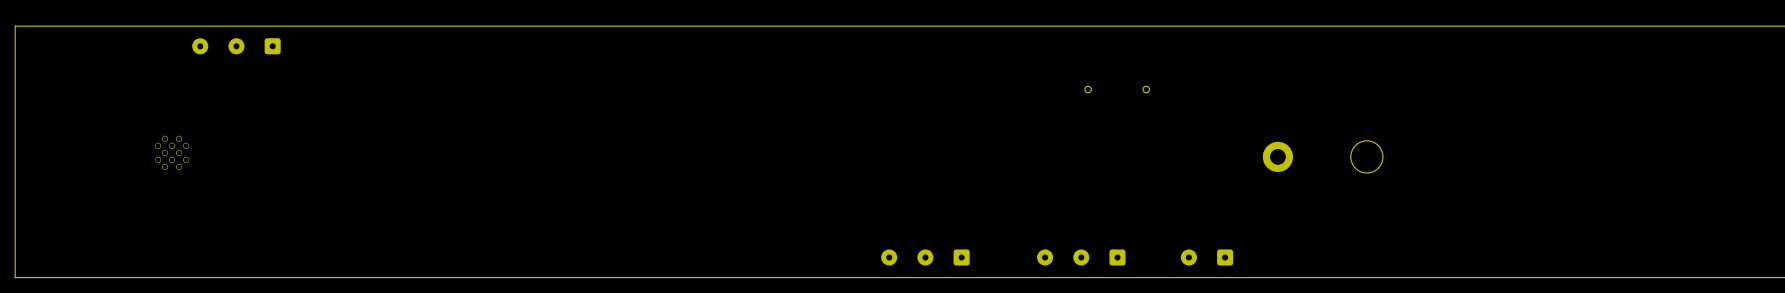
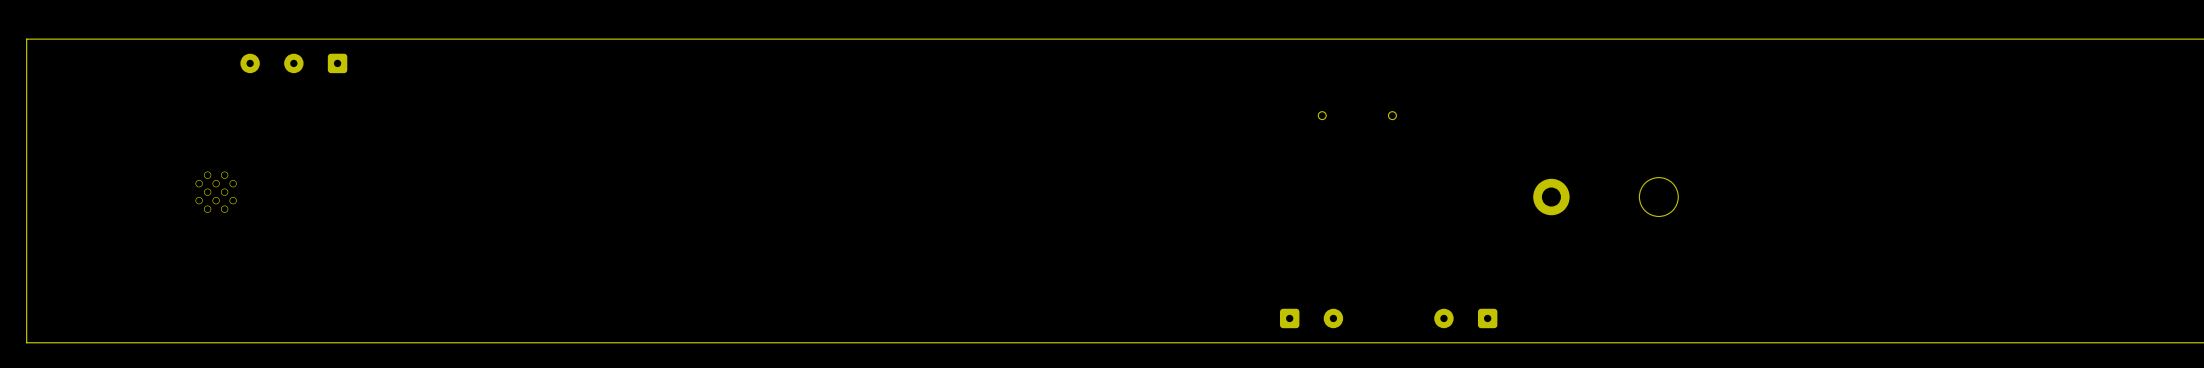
part footprint: [1037, 249, 1126, 266] -> [1279, 308, 1344, 329]
part: (925, 257) -> none

